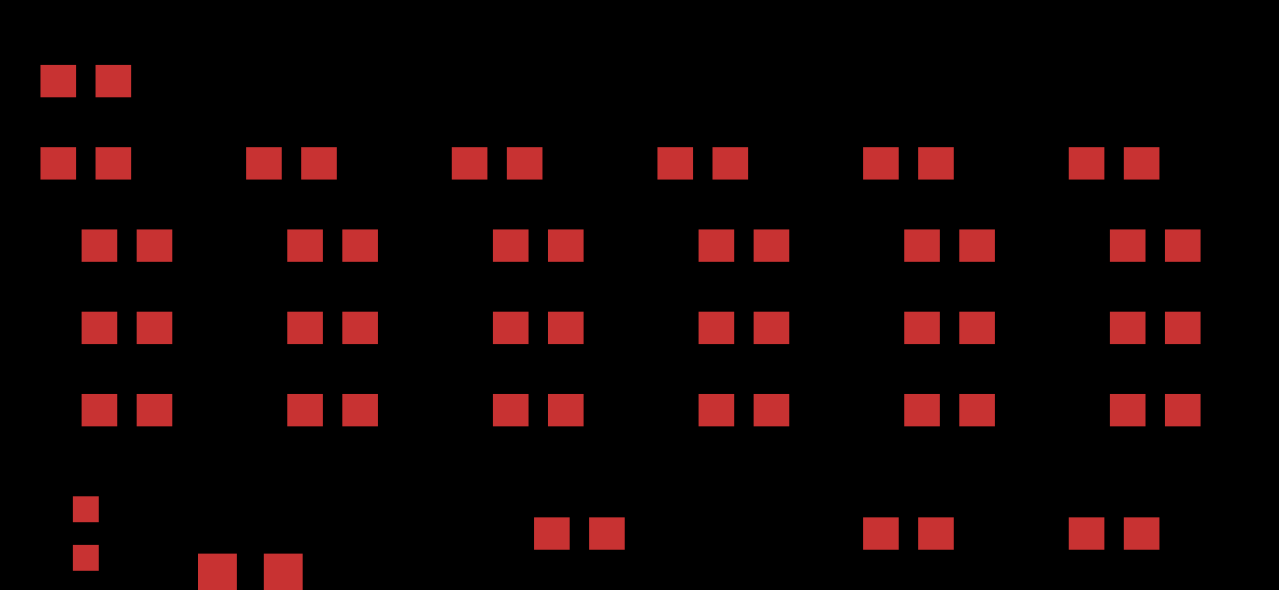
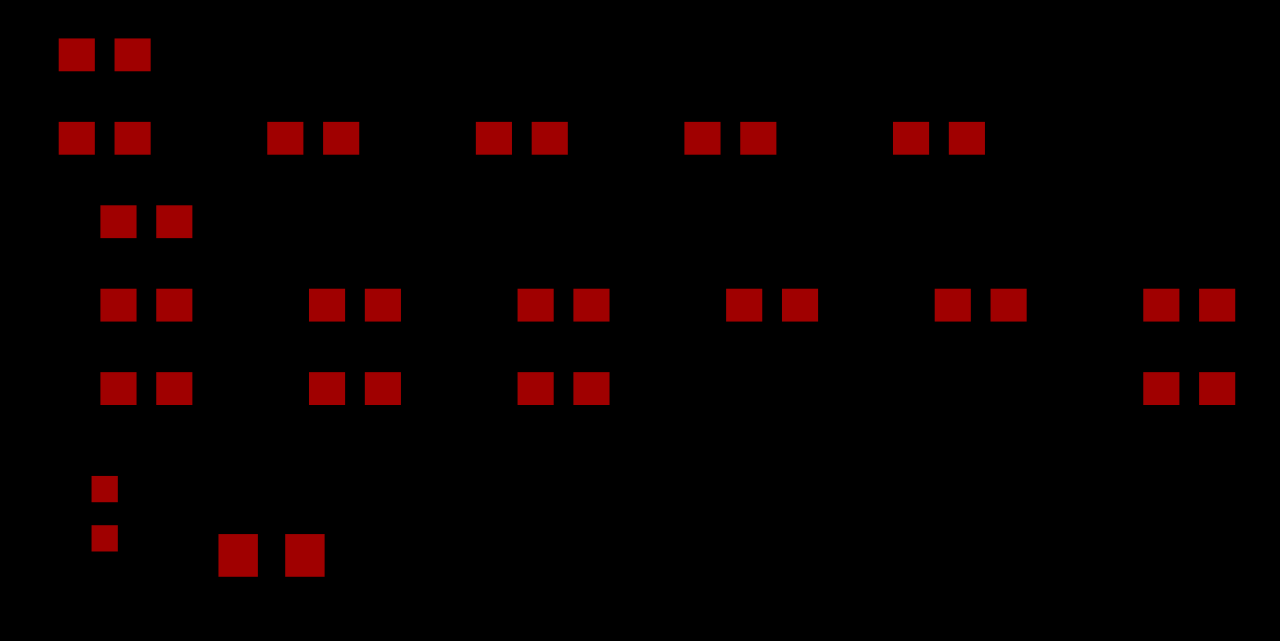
part: (1114, 163) -> none
part: (332, 245) -> none
part: (538, 245) -> none
part: (743, 245) -> none
part: (949, 245) -> none
part: (1155, 245) -> none
part: (743, 410) -> none
part: (949, 410) -> none
part: (579, 533) -> none
part: (908, 533) -> none
part: (1114, 533) -> none

